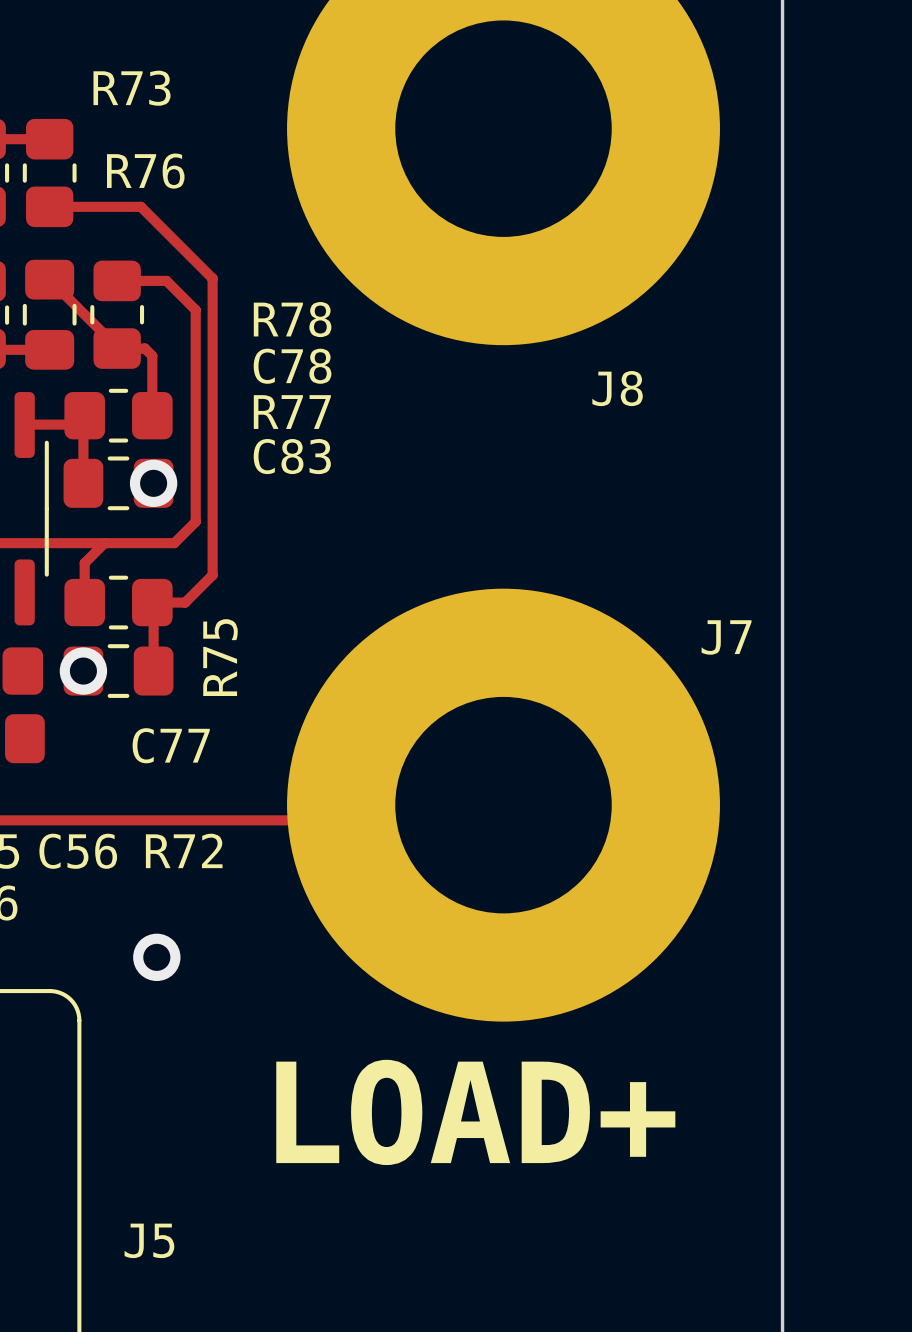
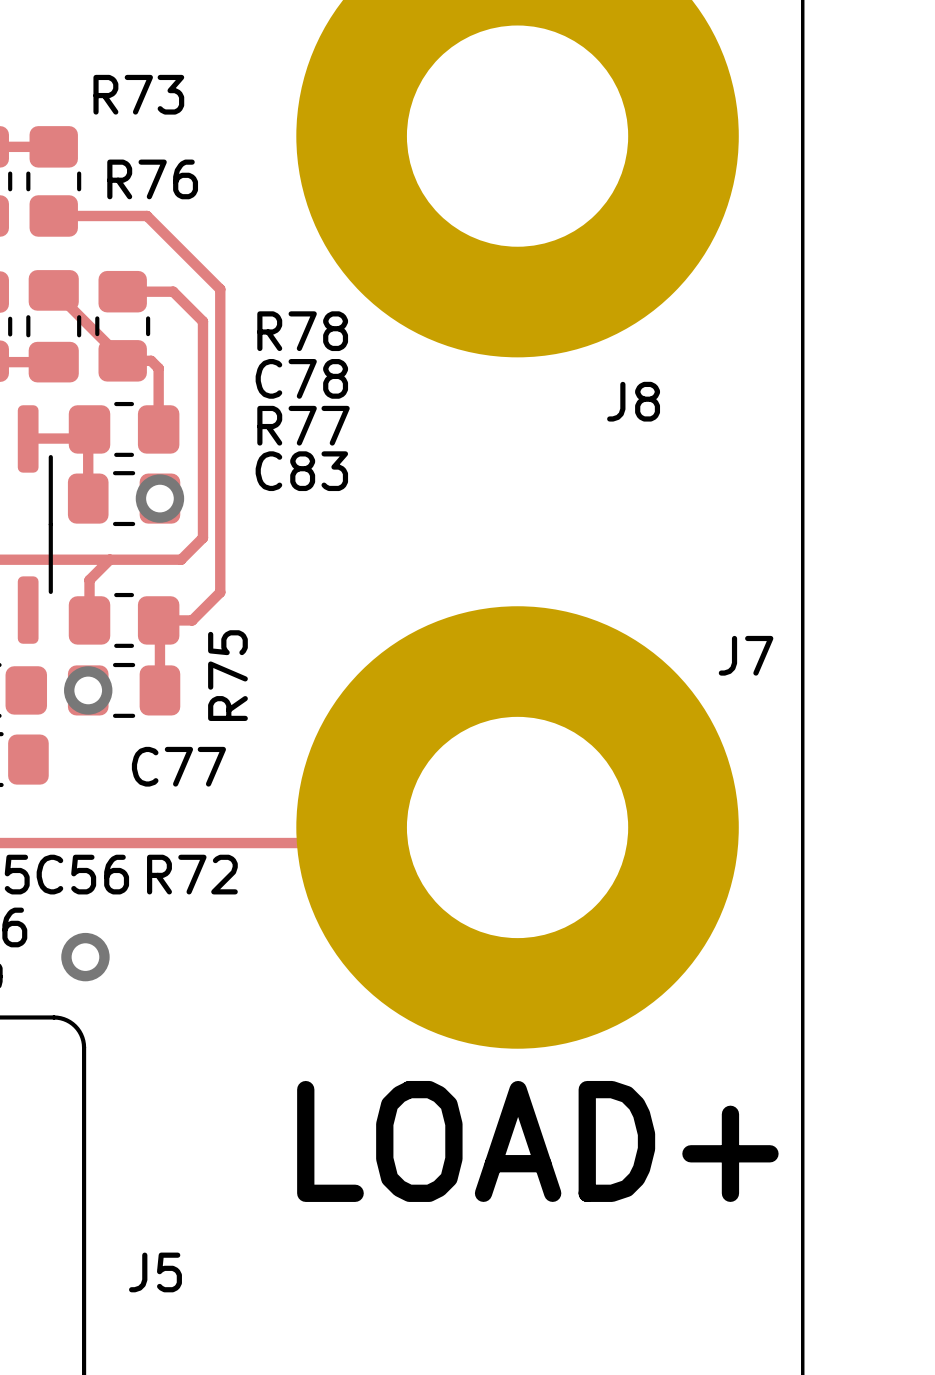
via position: (156, 957) -> (85, 957)

